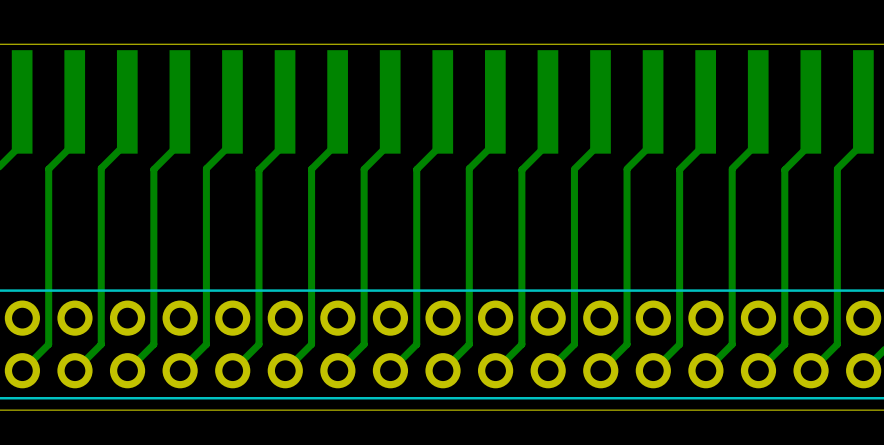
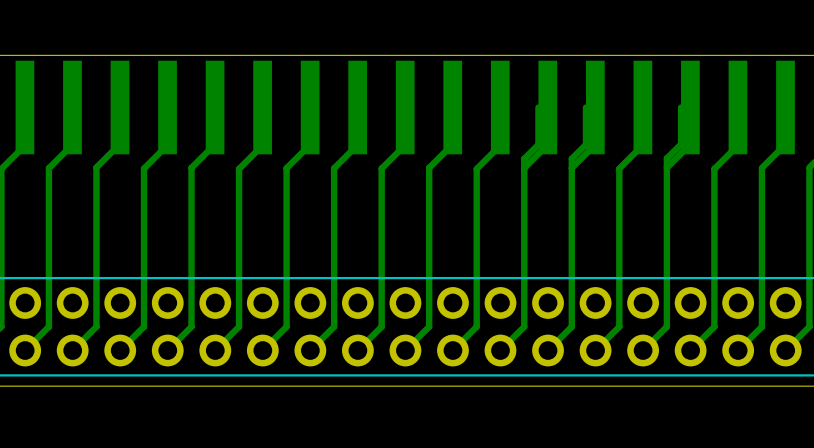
track: none -> (538, 107) (538, 144) (524, 158) (524, 169)
track: none -> (585, 107) (585, 144) (571, 158) (571, 169)
track: none -> (681, 107) (681, 144) (666, 158) (666, 169)

